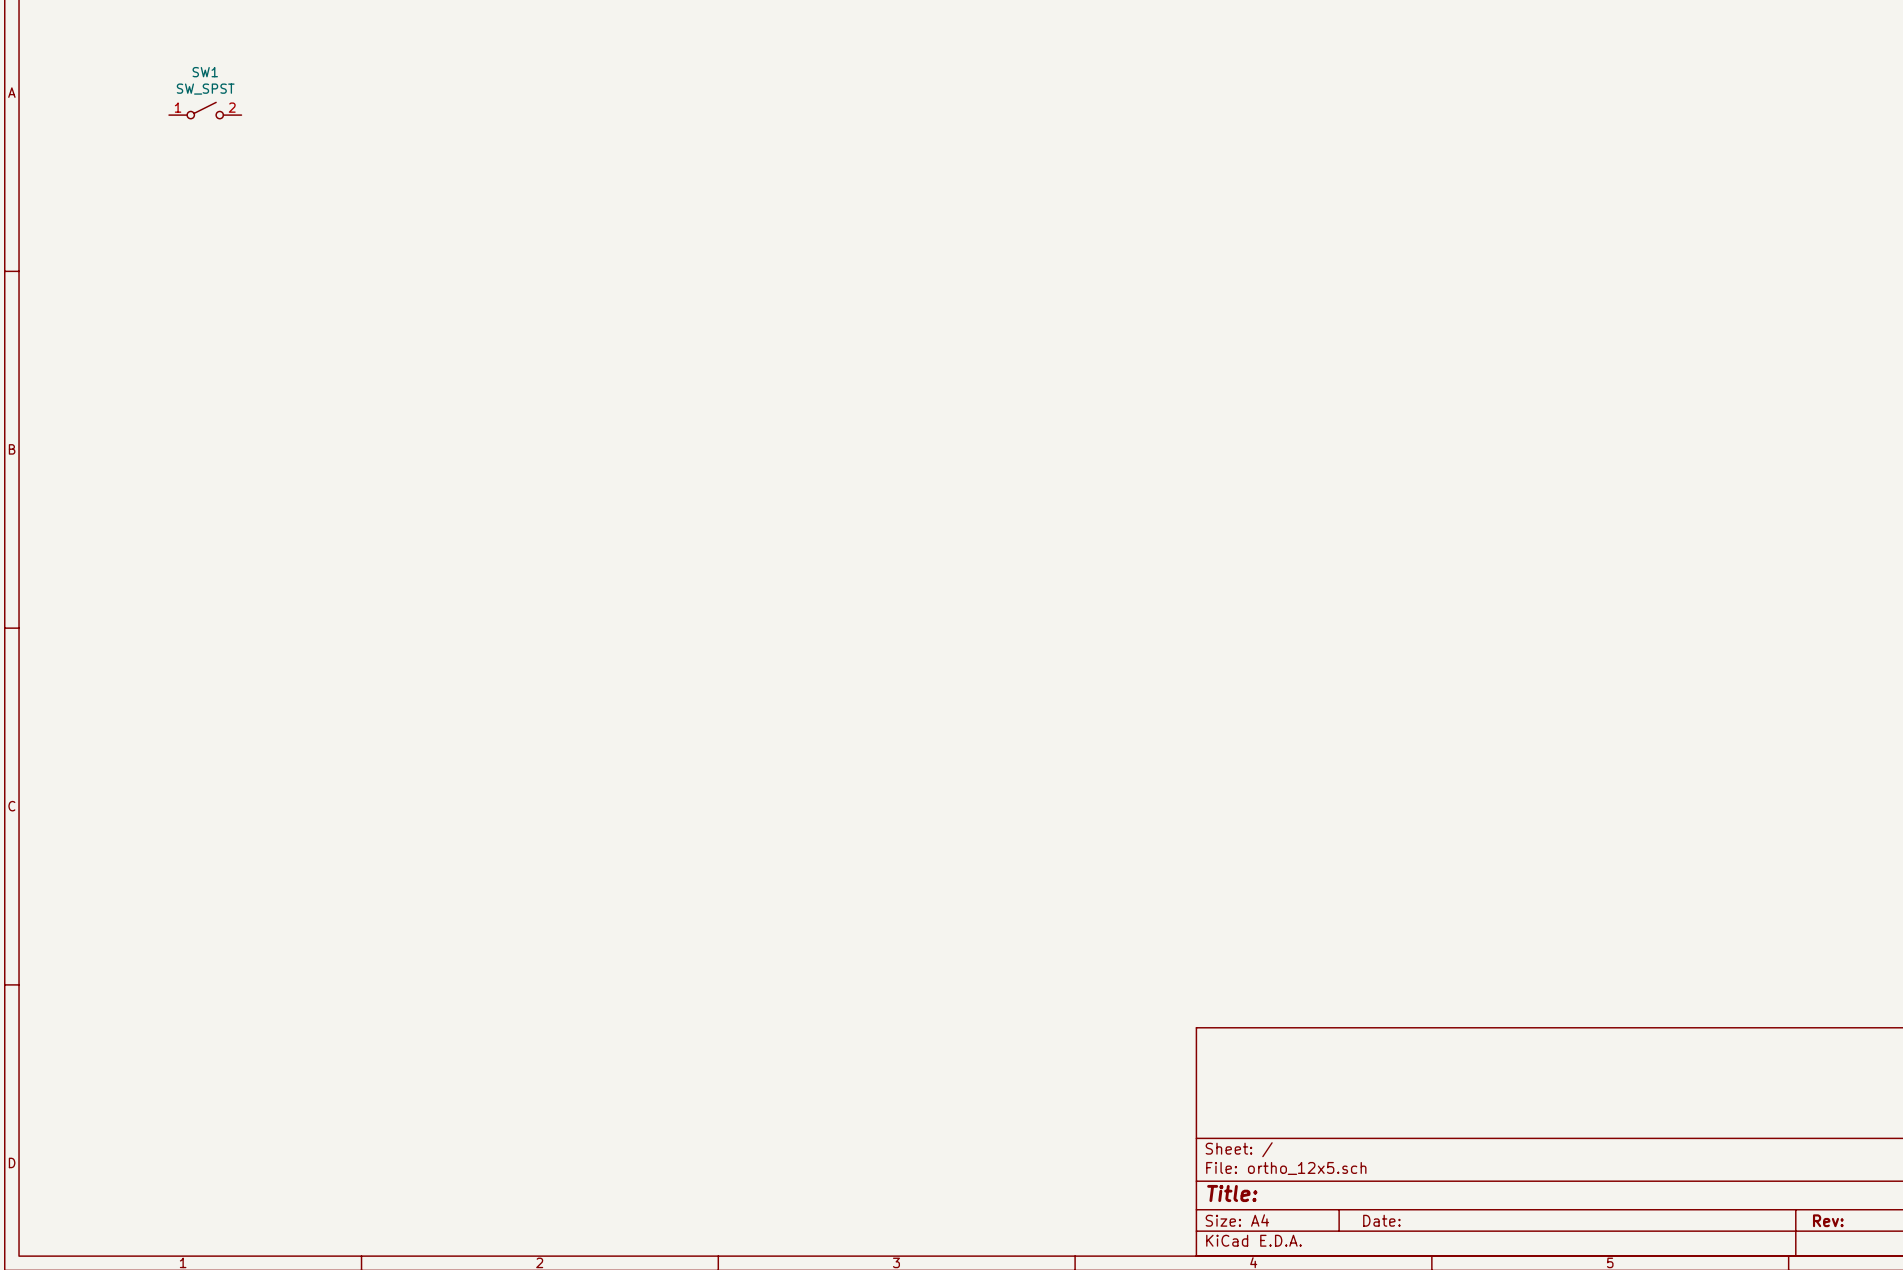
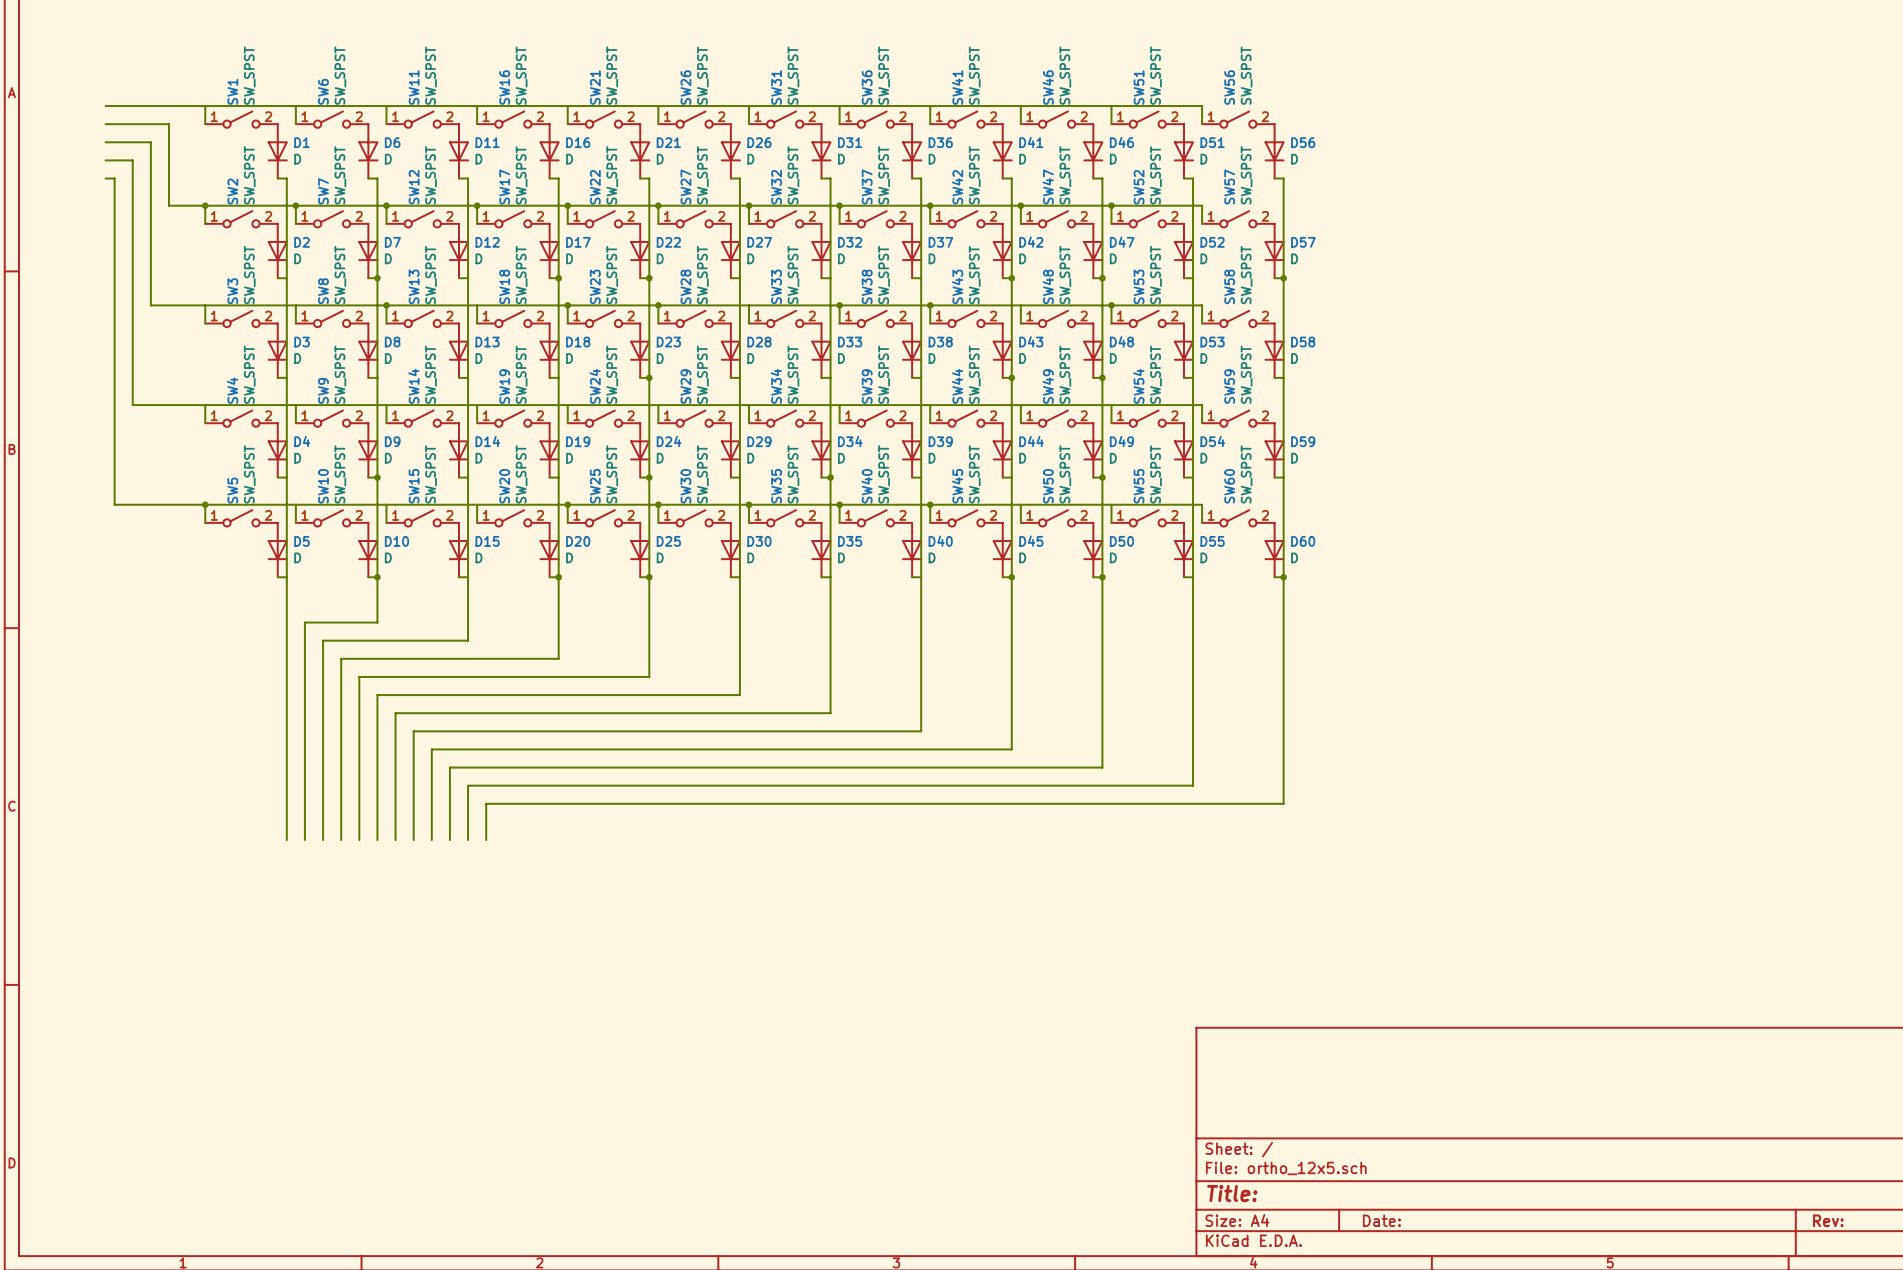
SW1 name rotation: 0° (205, 72) -> 90° counterclockwise (232, 91)
SW1 value rotation: 0° (205, 89) -> 90° counterclockwise (249, 75)
wire: none -> (105, 106) (1202, 106) (1202, 124)
wire: none -> (205, 106) (205, 124)
wire: none -> (295, 106) (295, 124)
wire: none -> (386, 106) (386, 124)
wire: none -> (477, 106) (477, 124)
wire: none -> (567, 106) (567, 124)
wire: none -> (658, 106) (658, 124)
wire: none -> (748, 106) (748, 124)
wire: none -> (839, 106) (839, 124)
wire: none -> (930, 106) (930, 124)
wire: none -> (1020, 106) (1020, 124)
wire: none -> (1111, 106) (1111, 124)
SW1 position: (205, 110) -> (241, 119)
SW6: none -> SW_SPST (332, 119)
SW11: none -> SW_SPST (422, 119)
SW16: none -> SW_SPST (513, 119)
SW21: none -> SW_SPST (603, 119)
SW26: none -> SW_SPST (694, 119)
SW31: none -> SW_SPST (785, 119)
SW36: none -> SW_SPST (875, 119)
SW41: none -> SW_SPST (966, 119)
SW46: none -> SW_SPST (1057, 119)
SW51: none -> SW_SPST (1147, 119)
SW56: none -> SW_SPST (1238, 119)
wire: none -> (105, 124) (169, 124) (169, 205) (1202, 205) (1202, 223)
wire: none -> (105, 142) (150, 142) (150, 305) (1202, 305) (1202, 323)
D1: none -> D (277, 151)
D6: none -> D (368, 151)
D11: none -> D (458, 151)
D16: none -> D (549, 151)
D21: none -> D (640, 151)
D26: none -> D (730, 151)
D31: none -> D (821, 151)
D36: none -> D (912, 151)
D41: none -> D (1002, 151)
D46: none -> D (1093, 151)
D51: none -> D (1183, 151)
D56: none -> D (1274, 151)
wire: none -> (105, 160) (132, 160) (132, 405) (1202, 405) (1202, 423)
wire: none -> (105, 178) (114, 178) (114, 504) (1202, 504) (1202, 522)
wire: none -> (277, 178) (286, 178) (286, 840)
wire: none -> (368, 178) (377, 178) (377, 622) (304, 622) (304, 840)
wire: none -> (458, 178) (468, 178) (468, 640) (323, 640) (323, 840)
wire: none -> (549, 178) (558, 178) (558, 658) (341, 658) (341, 840)
wire: none -> (640, 178) (649, 178) (649, 676) (359, 676) (359, 840)
wire: none -> (730, 178) (739, 178) (739, 695) (377, 695) (377, 840)
wire: none -> (821, 178) (830, 178) (830, 713) (395, 713) (395, 840)
wire: none -> (912, 178) (921, 178) (921, 731) (413, 731) (413, 840)
wire: none -> (1002, 178) (1011, 178) (1011, 749) (431, 749) (431, 840)
wire: none -> (1093, 178) (1102, 178) (1102, 767) (449, 767) (449, 840)
wire: none -> (1183, 178) (1193, 178) (1193, 785) (468, 785) (468, 840)
wire: none -> (1274, 178) (1283, 178) (1283, 803) (486, 803) (486, 840)
wire: none -> (205, 205) (205, 223)
junction: none -> (205, 205)
wire: none -> (295, 205) (295, 223)
junction: none -> (295, 205)
wire: none -> (386, 205) (386, 223)
junction: none -> (386, 205)
wire: none -> (477, 205) (477, 223)
junction: none -> (477, 205)
wire: none -> (567, 205) (567, 223)
junction: none -> (567, 205)
wire: none -> (658, 205) (658, 223)
junction: none -> (658, 205)
wire: none -> (748, 205) (748, 223)
junction: none -> (748, 205)
wire: none -> (839, 205) (839, 223)
junction: none -> (839, 205)
wire: none -> (930, 205) (930, 223)
junction: none -> (930, 205)
wire: none -> (1020, 205) (1020, 223)
junction: none -> (1020, 205)
wire: none -> (1111, 205) (1111, 223)
junction: none -> (1111, 205)
SW2: none -> SW_SPST (241, 219)
SW7: none -> SW_SPST (332, 219)
SW12: none -> SW_SPST (422, 219)
SW17: none -> SW_SPST (513, 219)
SW22: none -> SW_SPST (603, 219)
SW27: none -> SW_SPST (694, 219)
SW32: none -> SW_SPST (785, 219)
SW37: none -> SW_SPST (875, 219)
SW42: none -> SW_SPST (966, 219)
SW47: none -> SW_SPST (1057, 219)
SW52: none -> SW_SPST (1147, 219)
SW57: none -> SW_SPST (1238, 219)
D2: none -> D (277, 251)
D7: none -> D (368, 251)
D12: none -> D (458, 251)
D17: none -> D (549, 251)
D22: none -> D (640, 251)
D27: none -> D (730, 251)
D32: none -> D (821, 251)
D37: none -> D (912, 251)
D42: none -> D (1002, 251)
D47: none -> D (1093, 251)
D52: none -> D (1183, 251)
D57: none -> D (1274, 251)
wire: none -> (277, 278) (286, 278)
wire: none -> (368, 278) (377, 278)
junction: none -> (377, 278)
wire: none -> (458, 278) (468, 278)
wire: none -> (549, 278) (558, 278)
junction: none -> (558, 278)
wire: none -> (640, 278) (649, 278)
junction: none -> (649, 278)
wire: none -> (730, 278) (739, 278)
wire: none -> (821, 278) (830, 278)
wire: none -> (912, 278) (921, 278)
wire: none -> (1002, 278) (1011, 278)
junction: none -> (1011, 278)
wire: none -> (1093, 278) (1102, 278)
junction: none -> (1102, 278)
wire: none -> (1183, 278) (1193, 278)
wire: none -> (1274, 278) (1283, 278)
junction: none -> (1283, 278)
wire: none -> (205, 305) (205, 323)
wire: none -> (295, 305) (295, 323)
wire: none -> (386, 305) (386, 323)
junction: none -> (386, 305)
wire: none -> (477, 305) (477, 323)
wire: none -> (567, 305) (567, 323)
junction: none -> (567, 305)
wire: none -> (658, 305) (658, 323)
junction: none -> (658, 305)
wire: none -> (748, 305) (748, 323)
wire: none -> (839, 305) (839, 323)
junction: none -> (839, 305)
wire: none -> (930, 305) (930, 323)
junction: none -> (930, 305)
wire: none -> (1020, 305) (1020, 323)
wire: none -> (1111, 305) (1111, 323)
junction: none -> (1111, 305)
SW3: none -> SW_SPST (241, 318)
SW8: none -> SW_SPST (332, 318)
SW13: none -> SW_SPST (422, 318)
SW18: none -> SW_SPST (513, 318)
SW23: none -> SW_SPST (603, 318)
SW28: none -> SW_SPST (694, 318)
SW33: none -> SW_SPST (785, 318)
SW38: none -> SW_SPST (875, 318)
SW43: none -> SW_SPST (966, 318)
SW48: none -> SW_SPST (1057, 318)
SW53: none -> SW_SPST (1147, 318)
SW58: none -> SW_SPST (1238, 318)
D3: none -> D (277, 350)
D8: none -> D (368, 350)
D13: none -> D (458, 350)
D18: none -> D (549, 350)
D23: none -> D (640, 350)
D28: none -> D (730, 350)
D33: none -> D (821, 350)
D38: none -> D (912, 350)
D43: none -> D (1002, 350)
D48: none -> D (1093, 350)
D53: none -> D (1183, 350)
D58: none -> D (1274, 350)
wire: none -> (277, 377) (286, 377)
wire: none -> (368, 377) (377, 377)
wire: none -> (458, 377) (468, 377)
wire: none -> (549, 377) (558, 377)
wire: none -> (640, 377) (649, 377)
junction: none -> (649, 377)
wire: none -> (730, 377) (739, 377)
wire: none -> (821, 377) (830, 377)
wire: none -> (912, 377) (921, 377)
wire: none -> (1002, 377) (1011, 377)
junction: none -> (1011, 377)
wire: none -> (1093, 377) (1102, 377)
junction: none -> (1102, 377)
wire: none -> (1183, 377) (1193, 377)
wire: none -> (1274, 377) (1283, 377)
wire: none -> (205, 405) (205, 423)
wire: none -> (295, 405) (295, 423)
wire: none -> (386, 405) (386, 423)
wire: none -> (477, 405) (477, 423)
wire: none -> (567, 405) (567, 423)
wire: none -> (658, 405) (658, 423)
wire: none -> (748, 405) (748, 423)
wire: none -> (839, 405) (839, 423)
wire: none -> (930, 405) (930, 423)
wire: none -> (1020, 405) (1020, 423)
wire: none -> (1111, 405) (1111, 423)
SW4: none -> SW_SPST (241, 418)
SW9: none -> SW_SPST (332, 418)
SW14: none -> SW_SPST (422, 418)
SW19: none -> SW_SPST (513, 418)
SW24: none -> SW_SPST (603, 418)
SW29: none -> SW_SPST (694, 418)
SW34: none -> SW_SPST (785, 418)
SW39: none -> SW_SPST (875, 418)
SW44: none -> SW_SPST (966, 418)
SW49: none -> SW_SPST (1057, 418)
SW54: none -> SW_SPST (1147, 418)
SW59: none -> SW_SPST (1238, 418)
D4: none -> D (277, 450)
D9: none -> D (368, 450)
D14: none -> D (458, 450)
D19: none -> D (549, 450)
D24: none -> D (640, 450)
D29: none -> D (730, 450)
D34: none -> D (821, 450)
D39: none -> D (912, 450)
D44: none -> D (1002, 450)
D49: none -> D (1093, 450)
D54: none -> D (1183, 450)
D59: none -> D (1274, 450)
wire: none -> (277, 477) (286, 477)
wire: none -> (368, 477) (377, 477)
junction: none -> (377, 477)
wire: none -> (458, 477) (468, 477)
wire: none -> (549, 477) (558, 477)
wire: none -> (640, 477) (649, 477)
junction: none -> (649, 477)
wire: none -> (730, 477) (739, 477)
wire: none -> (821, 477) (830, 477)
junction: none -> (830, 477)
wire: none -> (912, 477) (921, 477)
wire: none -> (1002, 477) (1011, 477)
wire: none -> (1093, 477) (1102, 477)
junction: none -> (1102, 477)
wire: none -> (1183, 477) (1193, 477)
wire: none -> (1274, 477) (1283, 477)
wire: none -> (205, 504) (205, 522)
junction: none -> (205, 504)
wire: none -> (295, 504) (295, 522)
wire: none -> (386, 504) (386, 522)
wire: none -> (477, 504) (477, 522)
wire: none -> (567, 504) (567, 522)
junction: none -> (567, 504)
wire: none -> (658, 504) (658, 522)
junction: none -> (658, 504)
wire: none -> (748, 504) (748, 522)
junction: none -> (748, 504)
wire: none -> (839, 504) (839, 522)
junction: none -> (839, 504)
wire: none -> (930, 504) (930, 522)
junction: none -> (930, 504)
wire: none -> (1020, 504) (1020, 522)
wire: none -> (1111, 504) (1111, 522)
SW5: none -> SW_SPST (241, 518)
SW10: none -> SW_SPST (332, 518)
SW15: none -> SW_SPST (422, 518)
SW20: none -> SW_SPST (513, 518)
SW25: none -> SW_SPST (603, 518)
SW30: none -> SW_SPST (694, 518)
SW35: none -> SW_SPST (785, 518)
SW40: none -> SW_SPST (875, 518)
SW45: none -> SW_SPST (966, 518)
SW50: none -> SW_SPST (1057, 518)
SW55: none -> SW_SPST (1147, 518)
SW60: none -> SW_SPST (1238, 518)
D5: none -> D (277, 550)
D10: none -> D (368, 550)
D15: none -> D (458, 550)
D20: none -> D (549, 550)
D25: none -> D (640, 550)
D30: none -> D (730, 550)
D35: none -> D (821, 550)
D40: none -> D (912, 550)
D45: none -> D (1002, 550)
D50: none -> D (1093, 550)
D55: none -> D (1183, 550)
D60: none -> D (1274, 550)
wire: none -> (277, 577) (286, 577)
wire: none -> (368, 577) (377, 577)
junction: none -> (377, 577)
wire: none -> (458, 577) (468, 577)
wire: none -> (549, 577) (558, 577)
junction: none -> (558, 577)
wire: none -> (640, 577) (649, 577)
junction: none -> (649, 577)
wire: none -> (730, 577) (739, 577)
wire: none -> (821, 577) (830, 577)
wire: none -> (912, 577) (921, 577)
wire: none -> (1002, 577) (1011, 577)
junction: none -> (1011, 577)
wire: none -> (1093, 577) (1102, 577)
junction: none -> (1102, 577)
wire: none -> (1183, 577) (1193, 577)
wire: none -> (1274, 577) (1283, 577)
junction: none -> (1283, 577)

